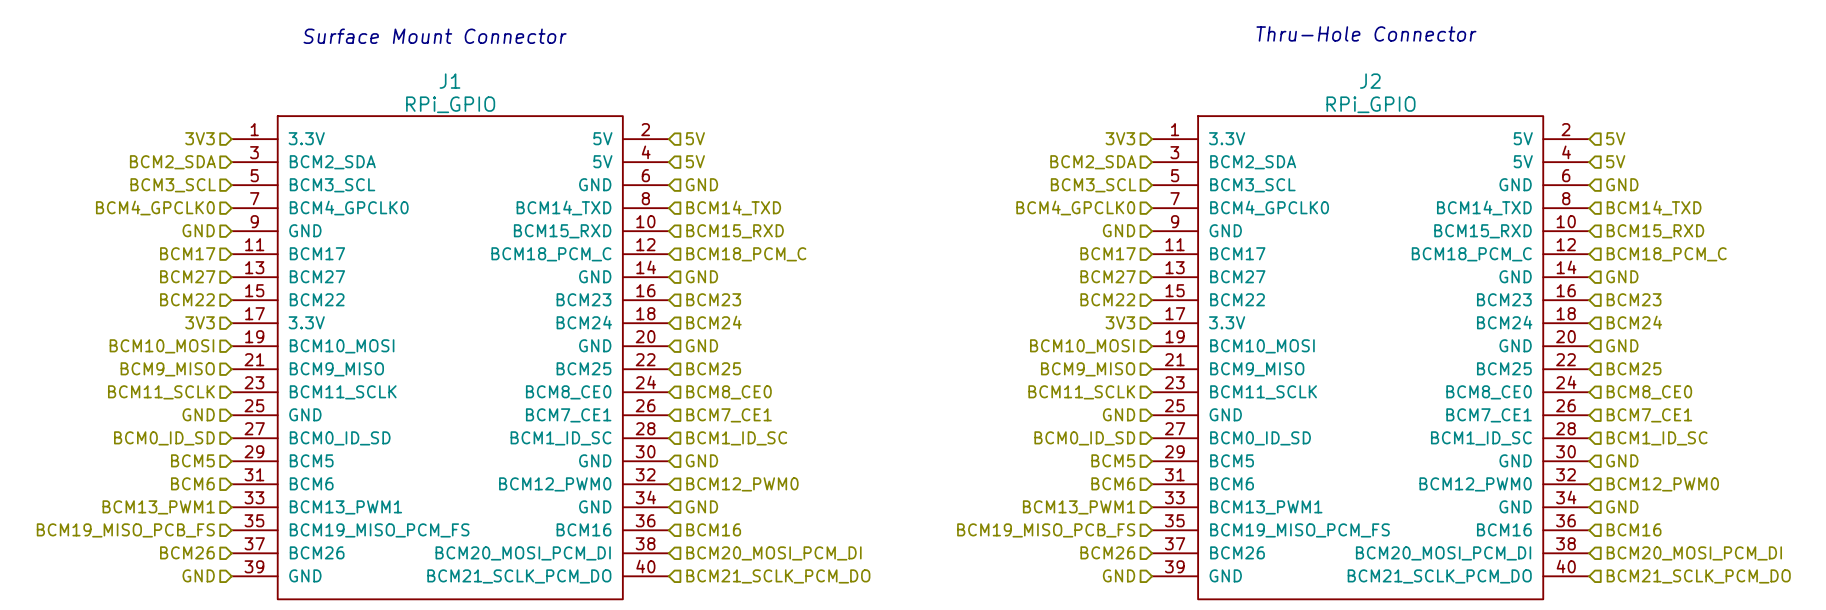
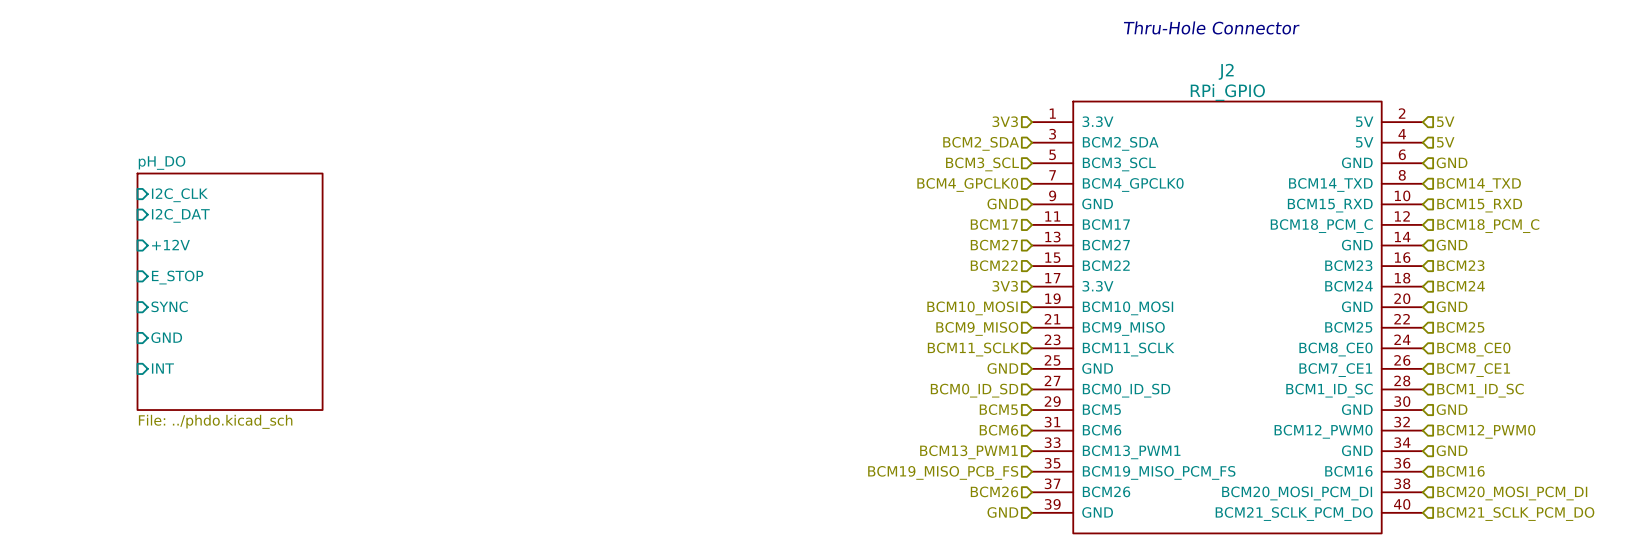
text: Surface Mount Connector (435, 36) -> none
hierarchical label: 3V3 (200, 138) -> none
hierarchical label: 5V (695, 138) -> none
hierarchical label: 5V (695, 161) -> none
hierarchical label: BCM2_SDA (172, 162) -> none
hierarchical label: GND (701, 184) -> none
hierarchical label: BCM3_SCL (173, 185) -> none
hierarchical label: BCM4_GPCLK0 (155, 208) -> none
hierarchical label: BCM14_TXD (733, 208) -> none
sheet pin: none -> I2C_CLK (179, 195)
hierarchical label: GND (198, 230) -> none
hierarchical label: BCM15_RXD (735, 231) -> none
sheet pin: none -> I2C_DAT (180, 215)
hierarchical label: BCM17 (187, 253) -> none
hierarchical label: BCM18_PCM_C (746, 254) -> none
hierarchical label: BCM27 (187, 276) -> none
sheet pin: none -> +12V (170, 245)
hierarchical label: GND (701, 276) -> none
hierarchical label: BCM22 (187, 299) -> none
hierarchical label: BCM23 (713, 299) -> none
sheet pin: none -> E_STOP (177, 277)
hierarchical label: 3V3 (200, 322) -> none
hierarchical label: BCM24 (713, 322) -> none
sheet pH_DO: none -> File: ../phdo.kicad_sch (230, 291)
sheet pin: none -> SYNC (169, 306)
hierarchical label: GND (701, 345) -> none
hierarchical label: BCM10_MOSI (161, 346) -> none
J1: RPi_GPIO (450, 357) -> none
hierarchical label: BCM25 (713, 368) -> none
hierarchical label: BCM9_MISO (167, 369) -> none
sheet pin: none -> GND (166, 337)
hierarchical label: BCM11_SCLK (161, 392) -> none
hierarchical label: BCM8_CE0 (729, 392) -> none
sheet pin: none -> INT (162, 368)
hierarchical label: GND (198, 414) -> none
hierarchical label: BCM7_CE1 (729, 415) -> none
hierarchical label: BCM0_ID_SD (164, 438) -> none
hierarchical label: BCM1_ID_SC (736, 438) -> none
hierarchical label: BCM5 (192, 460) -> none
hierarchical label: GND (701, 460) -> none
hierarchical label: BCM6 (192, 483) -> none
hierarchical label: BCM12_PWM0 (742, 484) -> none
hierarchical label: GND (701, 506) -> none
hierarchical label: BCM13_PWM1 (158, 507) -> none
hierarchical label: BCM16 (713, 529) -> none
hierarchical label: BCM19_MISO_PCB_FS (125, 530) -> none
hierarchical label: BCM26 (187, 552) -> none
hierarchical label: BCM20_MOSI_PCM_DI (773, 553) -> none
hierarchical label: GND (198, 575) -> none
hierarchical label: BCM21_SCLK_PCM_DO (778, 576) -> none

